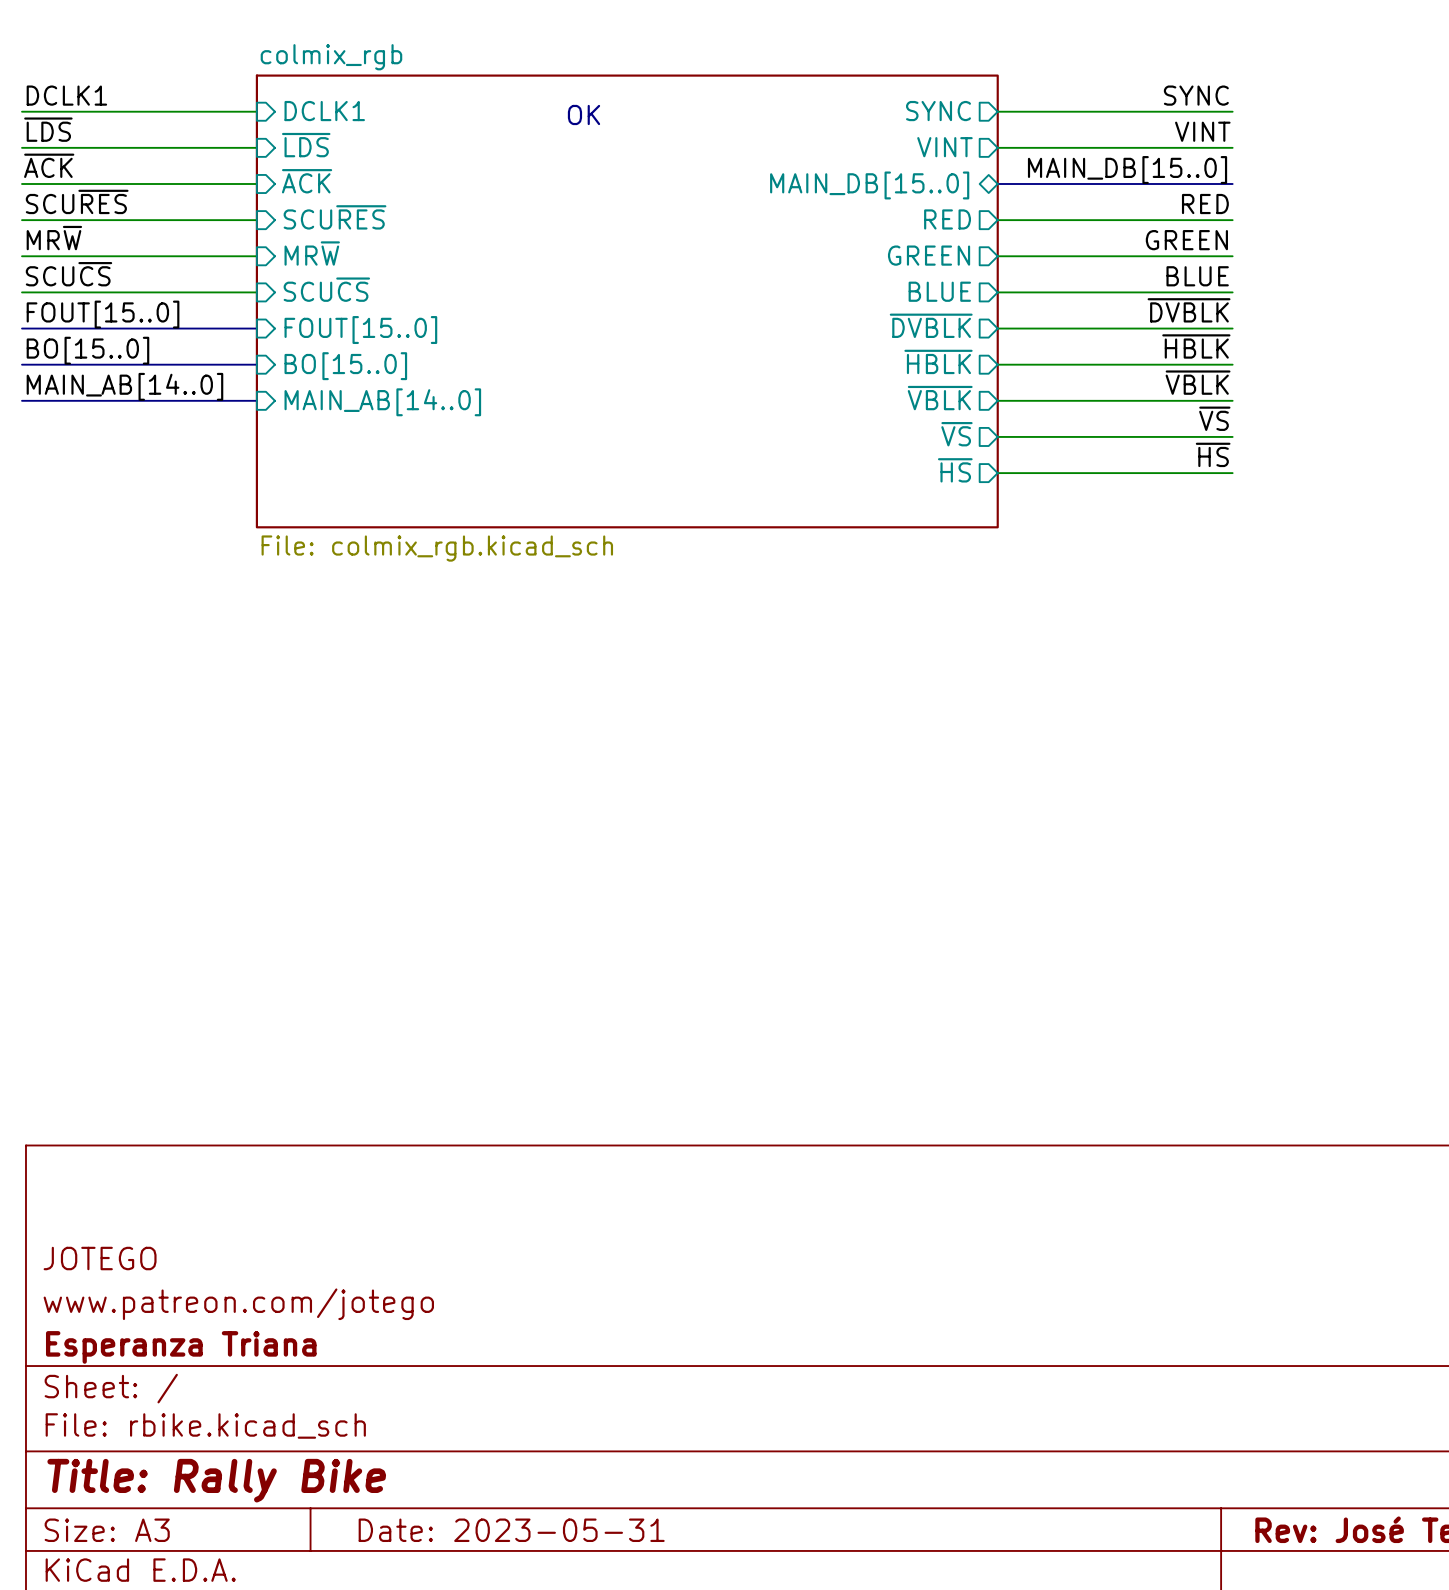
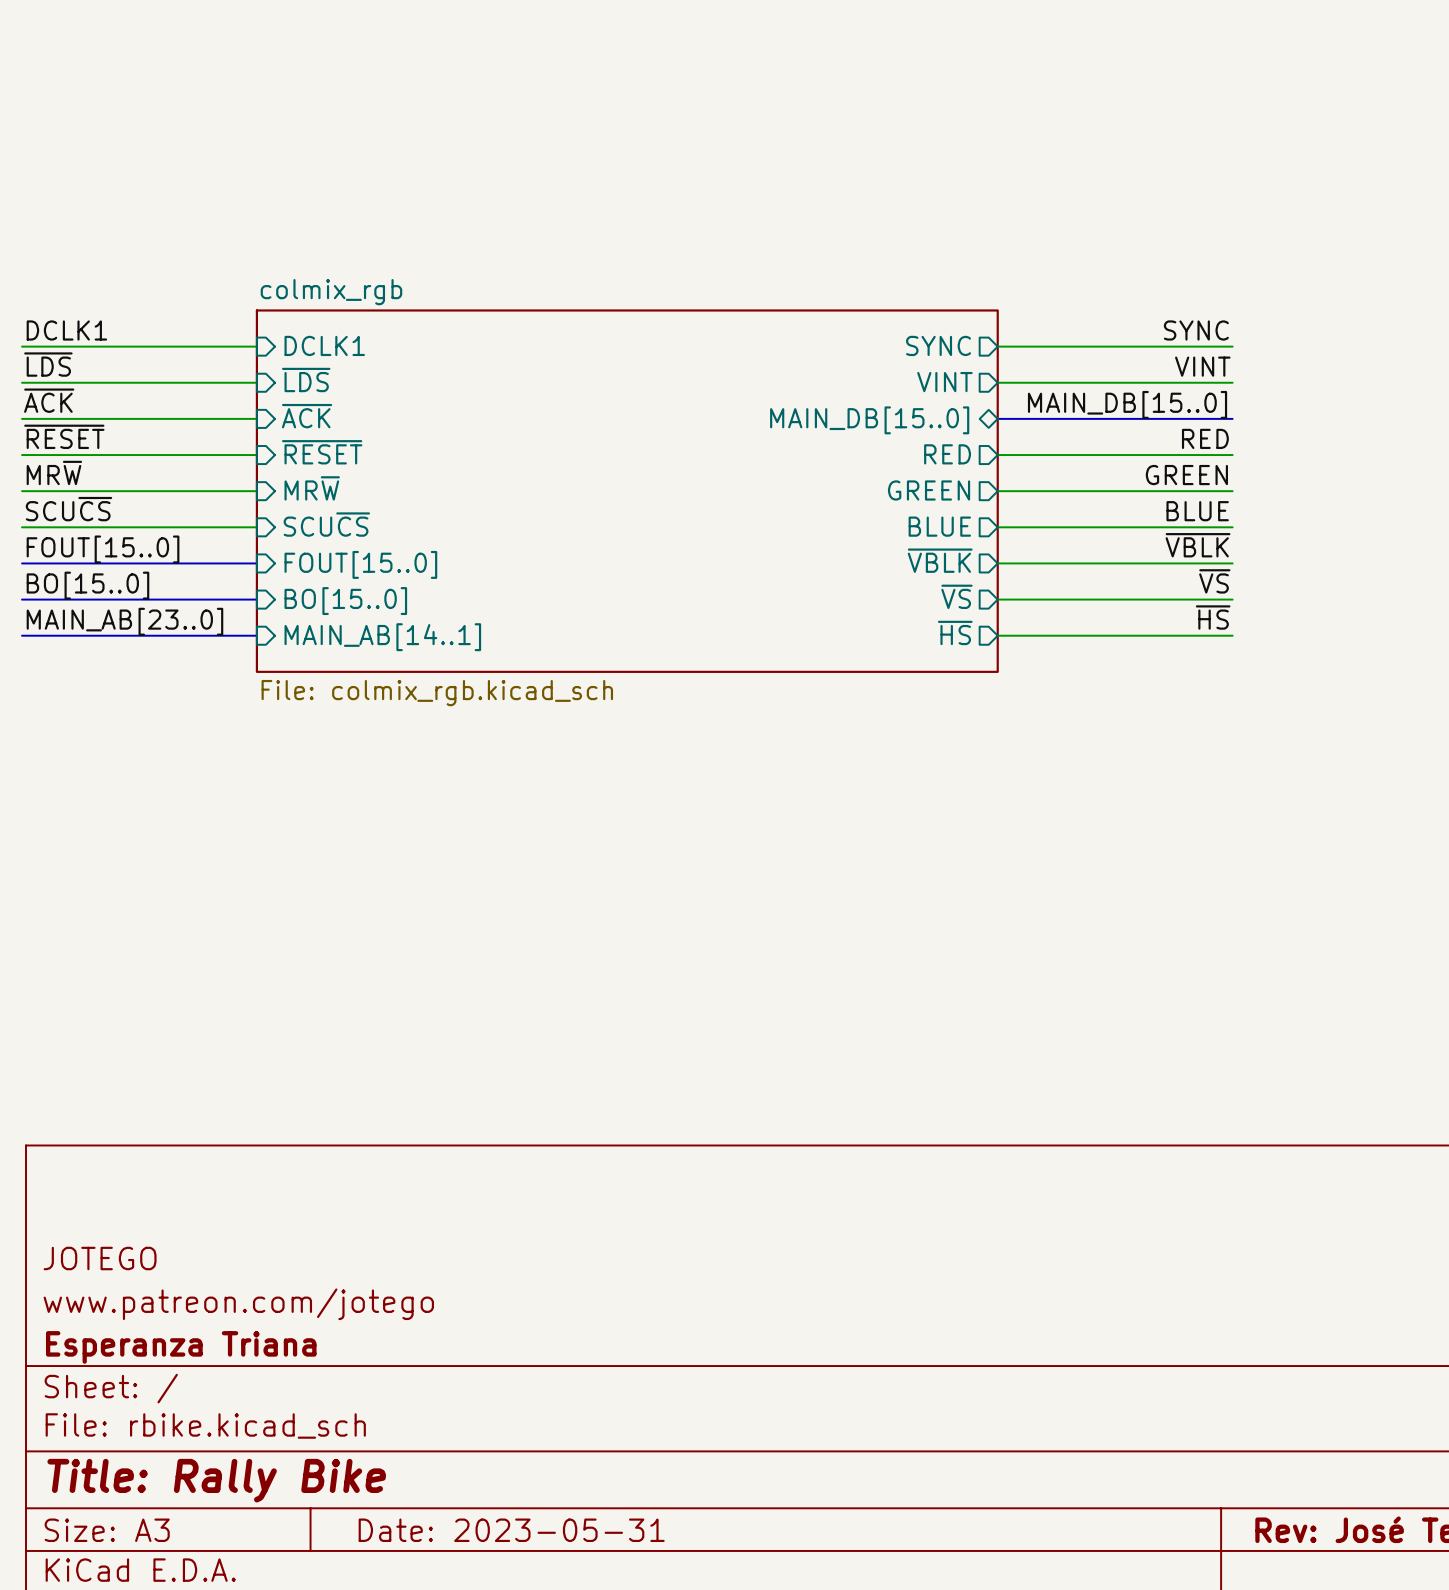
label position: DCLK1 (66, 95) -> DCLK1 (66, 330)
label position: SYNC (1196, 95) -> SYNC (1196, 330)
wire: (22, 111) (256, 111) -> (22, 346) (256, 346)
sheet pin position: DCLK1 (324, 111) -> DCLK1 (324, 345)
sheet pin position: SYNC (938, 111) -> SYNC (938, 345)
wire: (997, 111) (1232, 111) -> (997, 346) (1232, 346)
text: OK (584, 114) -> none
label position: ~{LDS} (48, 129) -> ~{LDS} (48, 364)
label position: VINT (1202, 131) -> VINT (1202, 366)
sheet pin position: ~{LDS} (306, 145) -> ~{LDS} (306, 380)
wire: (22, 147) (256, 147) -> (22, 382) (256, 382)
sheet pin position: VINT (944, 147) -> VINT (944, 382)
wire: (997, 147) (1232, 147) -> (997, 382) (1232, 382)
label position: ~{ACK} (49, 165) -> ~{ACK} (49, 400)
label position: MAIN_DB[15..0] (1127, 170) -> MAIN_DB[15..0] (1127, 404)
sheet pin position: ~{ACK} (307, 181) -> ~{ACK} (307, 416)
wire: (22, 183) (256, 183) -> (22, 418) (256, 418)
bus: (997, 183) (1232, 183) -> (997, 418) (1232, 418)
sheet pin position: MAIN_DB[15..0] (869, 185) -> MAIN_DB[15..0] (869, 420)
label: SCU~{RES} (77, 201) -> none
label position: RED (1205, 204) -> RED (1205, 438)
sheet pin: SCU~{RES} (335, 217) -> none
sheet pin position: RED (947, 219) -> RED (947, 454)
wire: (22, 220) (256, 220) -> (22, 455) (256, 455)
wire: (997, 220) (1232, 220) -> (997, 455) (1232, 455)
label position: MR~{W} (54, 238) -> MR~{W} (54, 472)
label position: GREEN (1186, 240) -> GREEN (1186, 475)
sheet pin position: MR~{W} (312, 253) -> MR~{W} (312, 488)
sheet pin position: GREEN (929, 255) -> GREEN (929, 490)
wire: (22, 256) (256, 256) -> (22, 491) (256, 491)
wire: (997, 256) (1232, 256) -> (997, 491) (1232, 491)
label position: SCU~{CS} (68, 274) -> SCU~{CS} (68, 509)
label position: BLUE (1197, 276) -> BLUE (1197, 511)
sheet pin position: SCU~{CS} (326, 289) -> SCU~{CS} (326, 524)
sheet pin position: BLUE (939, 291) -> BLUE (939, 526)
wire: (22, 292) (256, 292) -> (22, 527) (256, 527)
wire: (997, 292) (1232, 292) -> (997, 527) (1232, 527)
sheet colmix_rgb: File: colmix_rgb.kicad_sch (627, 301) -> none
label: ~{DVBLK} (1189, 310) -> none
label position: FOUT[15..0] (103, 314) -> FOUT[15..0] (103, 549)
sheet pin: ~{DVBLK} (931, 325) -> none
bus: (22, 328) (256, 328) -> (22, 563) (256, 563)
wire: (997, 328) (1232, 328) -> (997, 563) (1232, 563)
sheet pin position: FOUT[15..0] (360, 330) -> FOUT[15..0] (360, 564)
label: ~{HBLK} (1196, 346) -> none
label position: BO[15..0] (87, 350) -> BO[15..0] (87, 585)
sheet pin: ~{HBLK} (938, 361) -> none
bus: (22, 364) (256, 364) -> (22, 599) (256, 599)
wire: (997, 364) (1232, 364) -> (997, 599) (1232, 599)
sheet pin position: BO[15..0] (345, 366) -> BO[15..0] (345, 601)
label position: ~{VBLK} (1198, 382) -> ~{VBLK} (1198, 545)
label: MAIN_AB[14..0] (124, 386) -> none
sheet pin position: ~{VBLK} (940, 398) -> ~{VBLK} (940, 560)
bus: (22, 400) (256, 400) -> (22, 635) (256, 635)
wire: (997, 400) (1232, 400) -> (997, 635) (1232, 635)
sheet pin: MAIN_AB[14..0] (382, 402) -> none
label position: ~{VS} (1214, 418) -> ~{VS} (1214, 581)
sheet pin position: ~{VS} (956, 434) -> ~{VS} (956, 596)
label: none -> ~{RESET} (64, 436)
wire: (997, 436) (1232, 436) -> none
sheet pin: none -> ~{RESET} (322, 452)
label position: ~{HS} (1213, 454) -> ~{HS} (1213, 617)
sheet pin position: ~{HS} (955, 470) -> ~{HS} (955, 632)
wire: (997, 473) (1232, 473) -> none
sheet colmix_rgb: none -> File: colmix_rgb.kicad_sch (627, 491)
label: none -> MAIN_AB[23..0] (124, 621)
sheet pin: none -> MAIN_AB[14..1] (382, 637)

